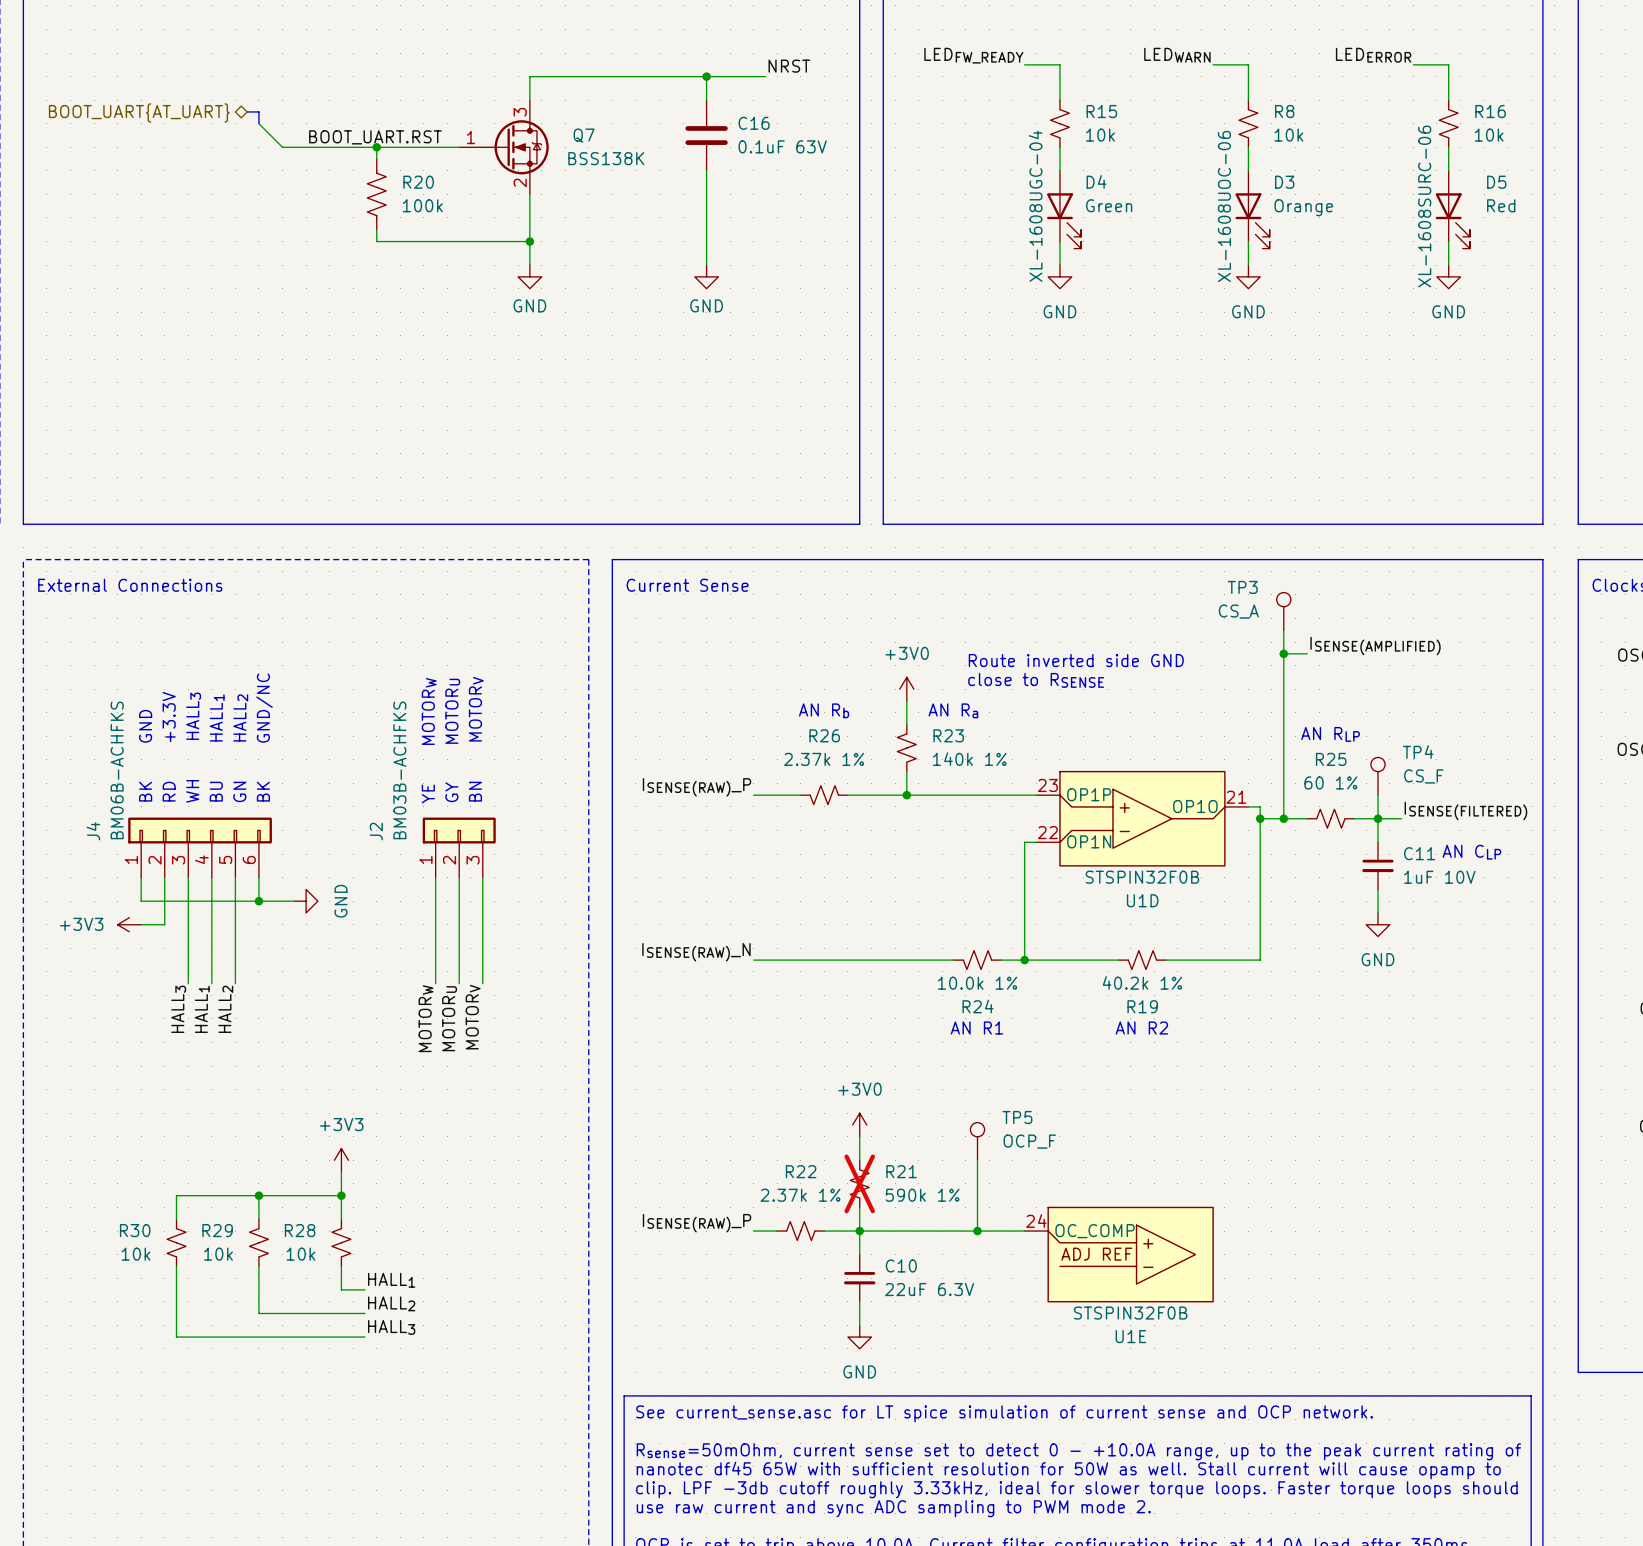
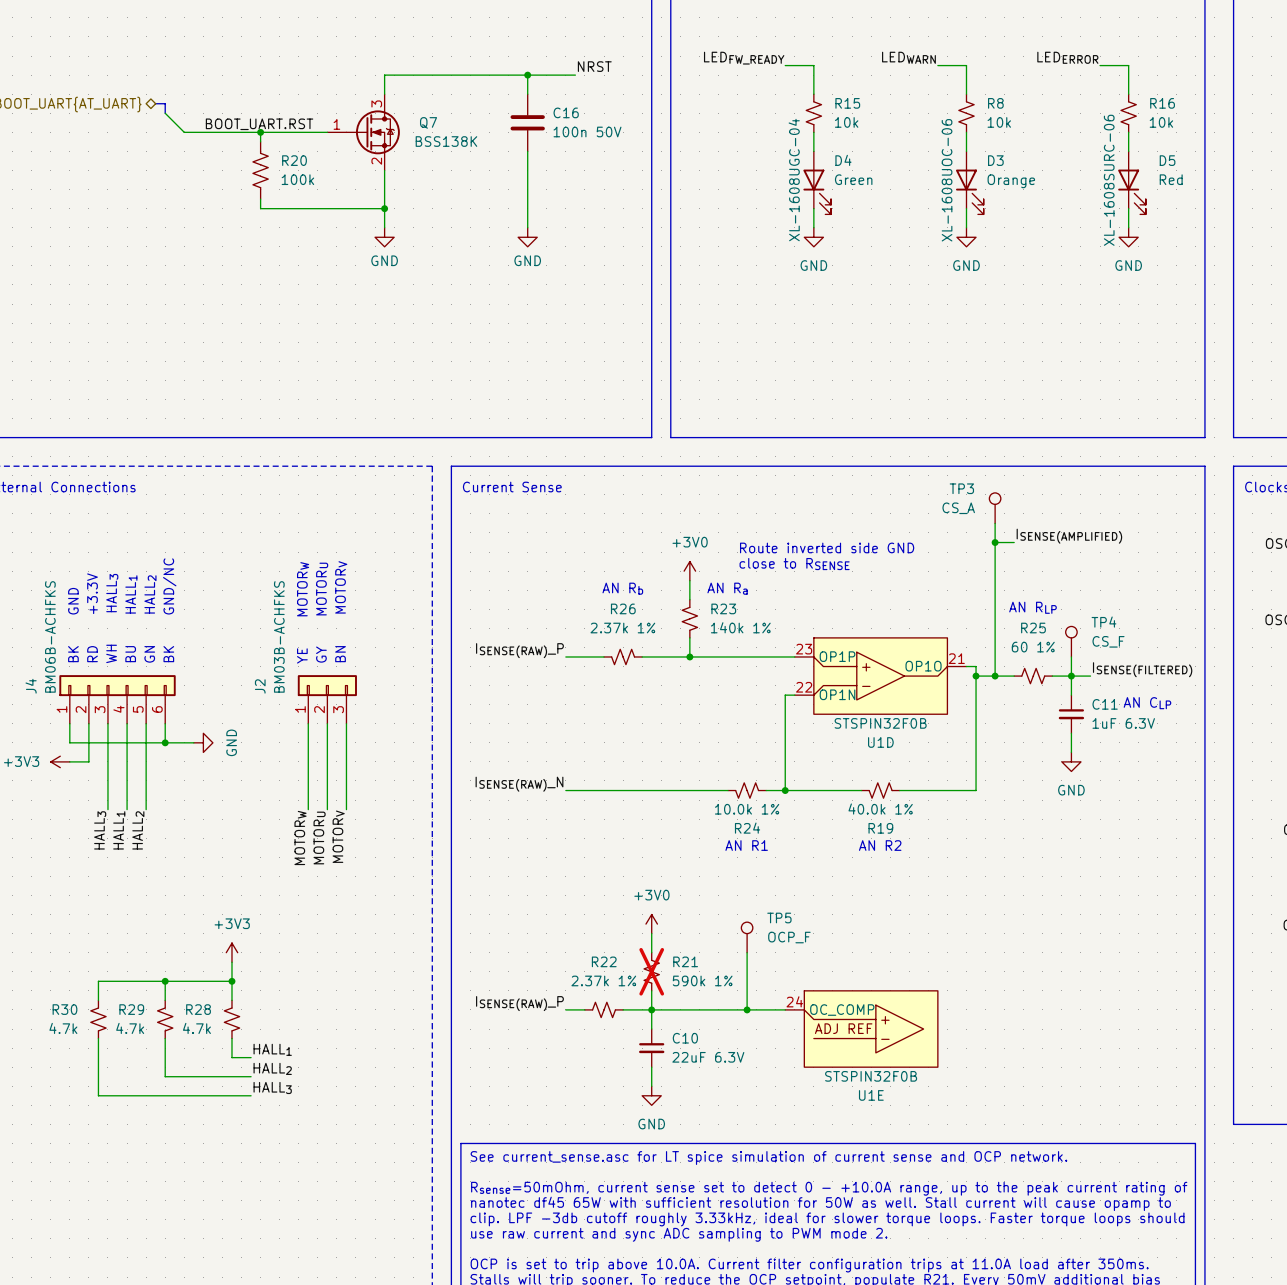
C16 value: 0.1uF 63V (782, 146) -> 100n 50V (587, 131)
C11 value: 1uF 10V (1439, 877) -> 1uF 6.3V (1123, 723)
R19 value: 40.2k 1% (1142, 982) -> 40.0k 1% (880, 809)
R30 flip: as is (176, 1242) -> left-right (98, 1019)
R30 value: 10k (136, 1254) -> 4.7k (63, 1028)
R29 value: 10k (218, 1254) -> 4.7k (130, 1028)
R28 value: 10k (300, 1254) -> 4.7k (196, 1028)

